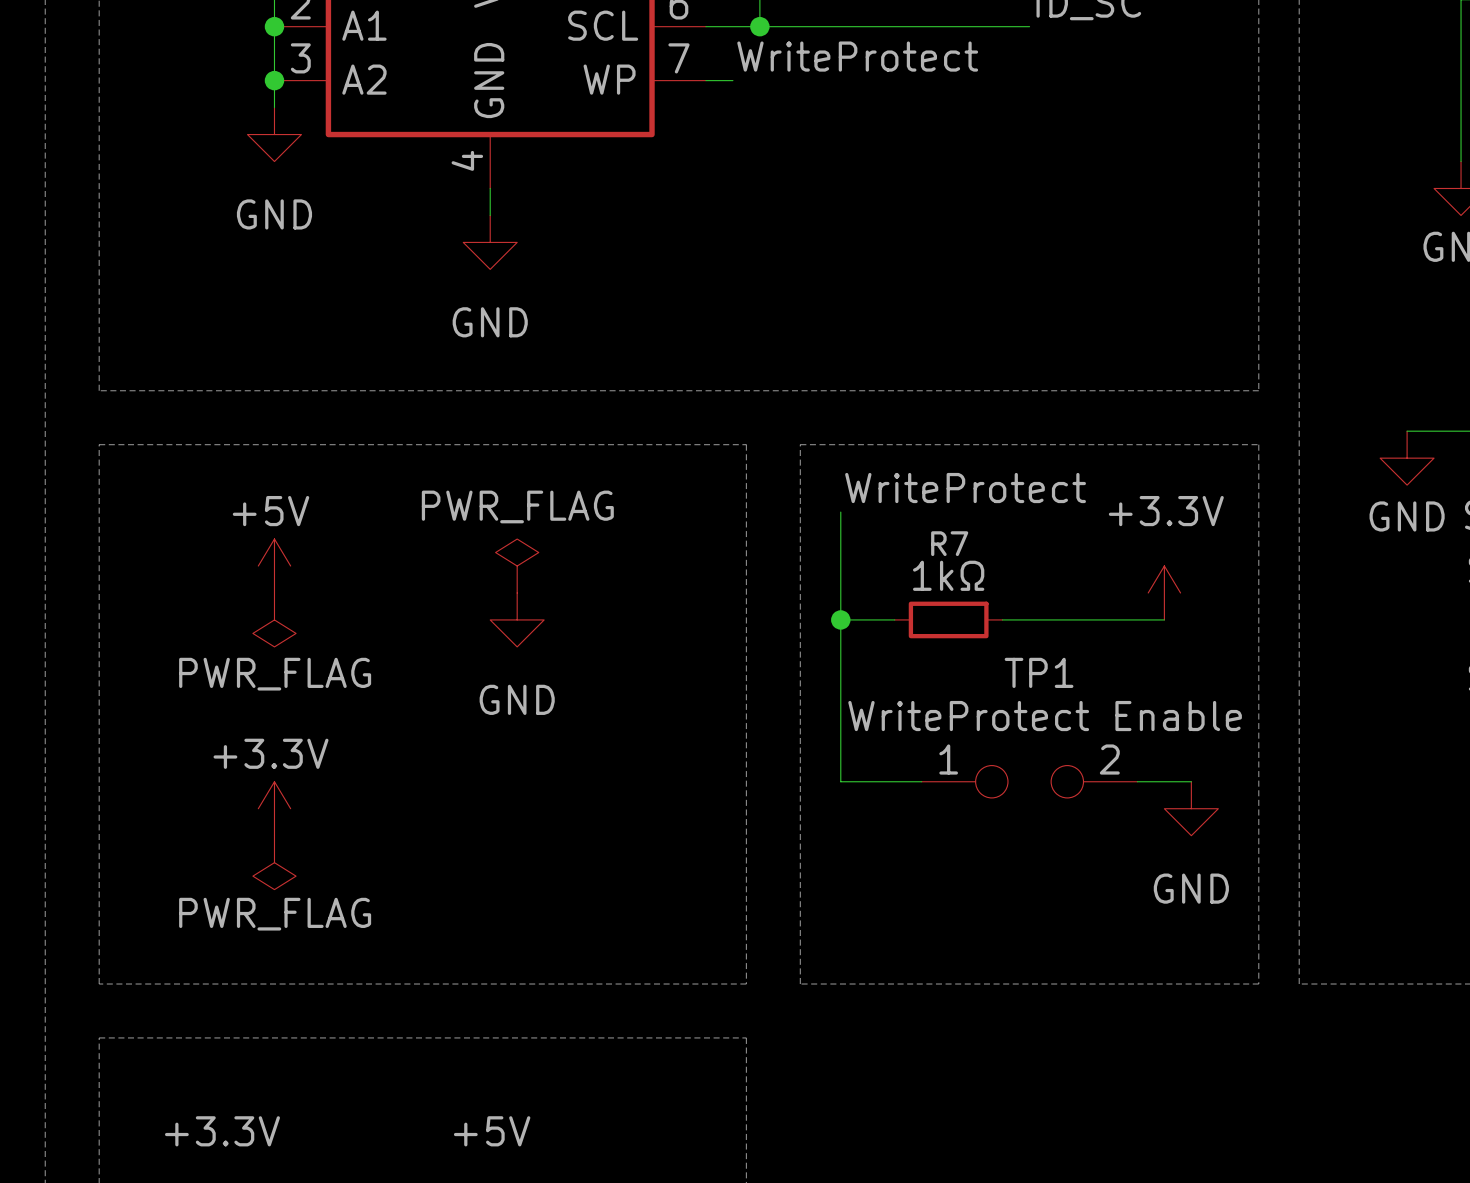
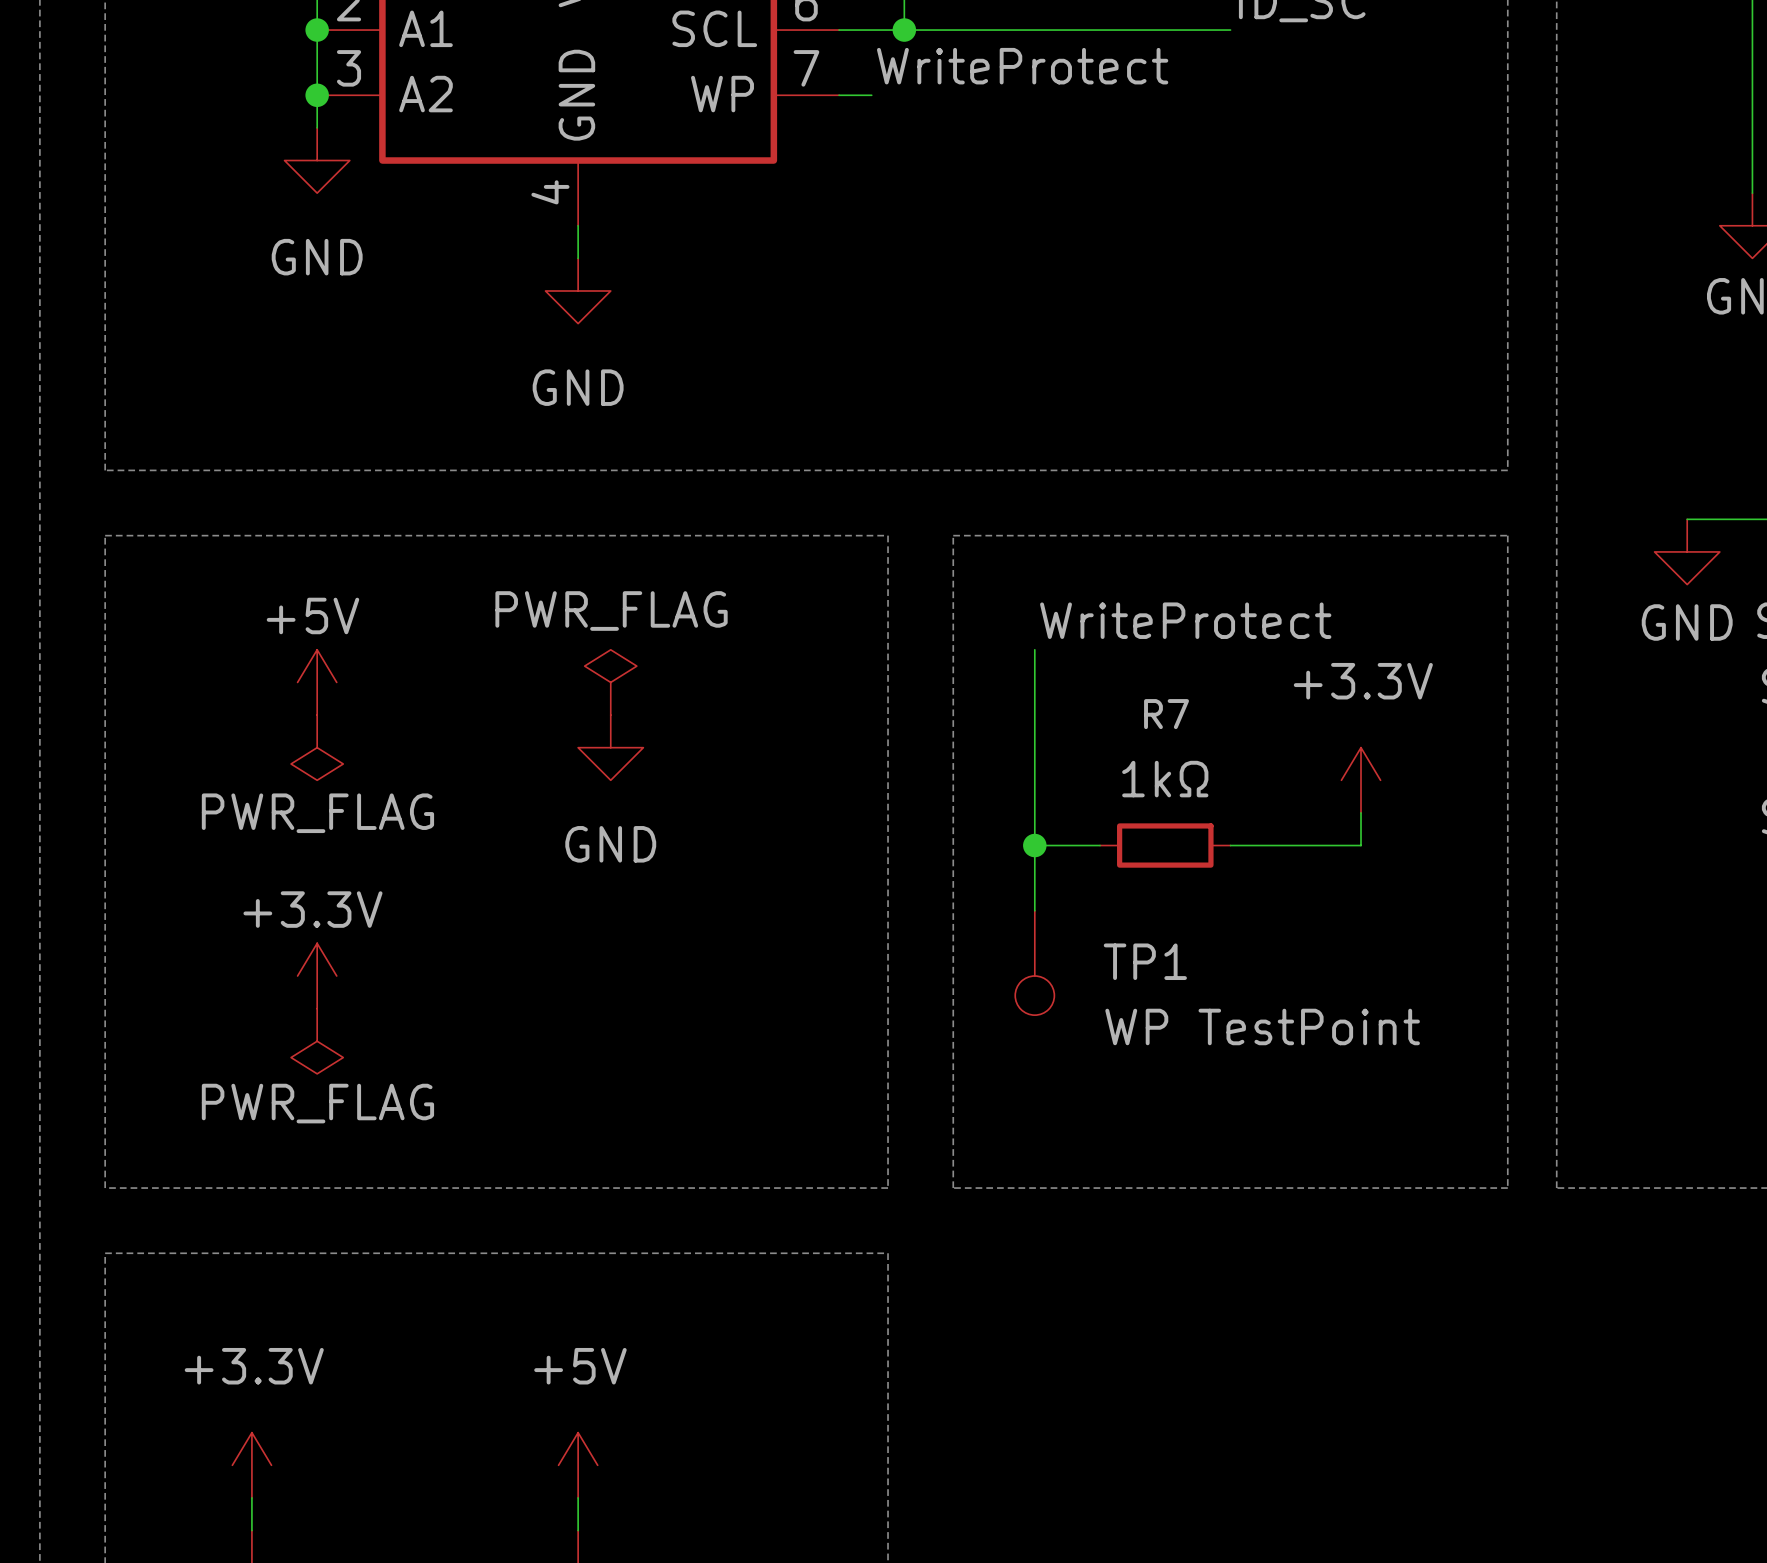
label position: WriteProtect (965, 488) -> WriteProtect (1185, 620)
wire: (840, 512) (840, 781) (921, 781) -> none
wire: none -> (1034, 649) (1034, 910)
R7 name position: R7 (949, 543) -> R7 (1166, 714)
R7 value position: 1kΩ (948, 575) -> 1kΩ (1165, 779)
power symbol position: +3.3V (1164, 592) -> +3.3V (1361, 780)
wire: (840, 619) (894, 619) -> (1034, 845) (1100, 845)
junction position: (840, 619) -> (1034, 845)
R7 position: (948, 619) -> (1165, 845)
wire: (1002, 619) (1164, 619) -> none
TP1 name position: TP1 (1039, 672) -> TP1 (1145, 961)
wire: none -> (1361, 812) (1361, 845) (1230, 845)
TP1 value: WriteProtect Enable (1045, 716) -> WP TestPoint (1262, 1026)
TP1 symbol: [921, 765, 1138, 798] -> [1015, 910, 1055, 1016]
wire: (1137, 781) (1191, 781) -> none
power symbol: GND (1191, 808) -> none

